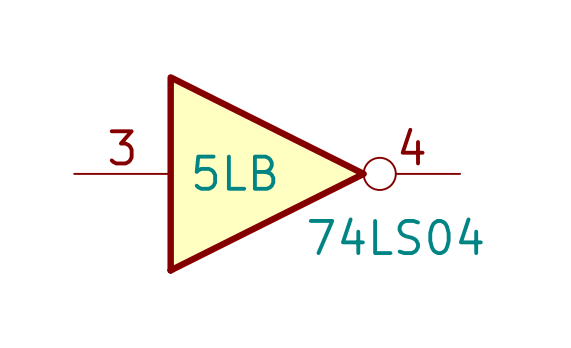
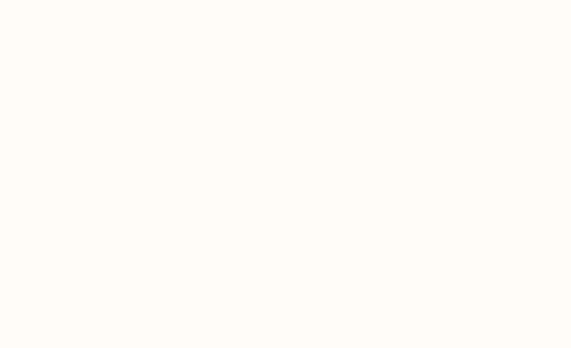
5LB: 74LS04 (267, 173) -> none

